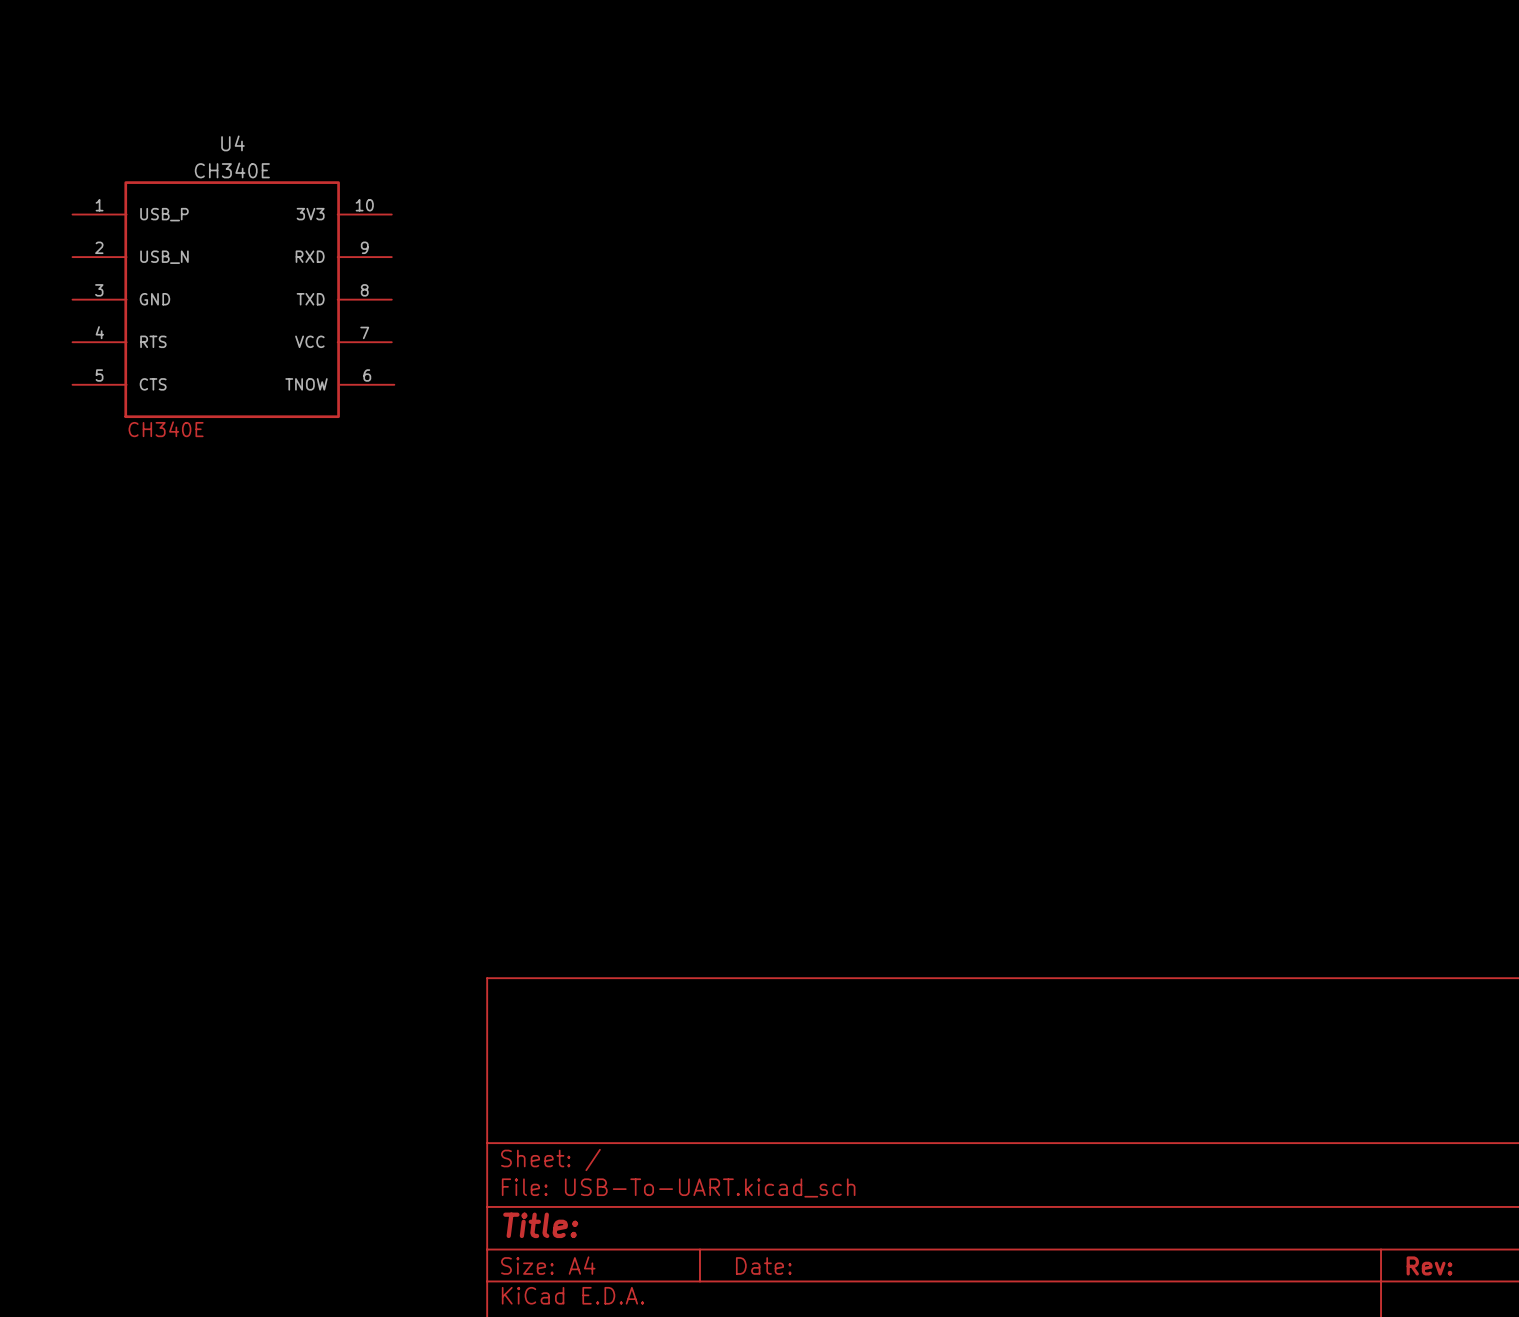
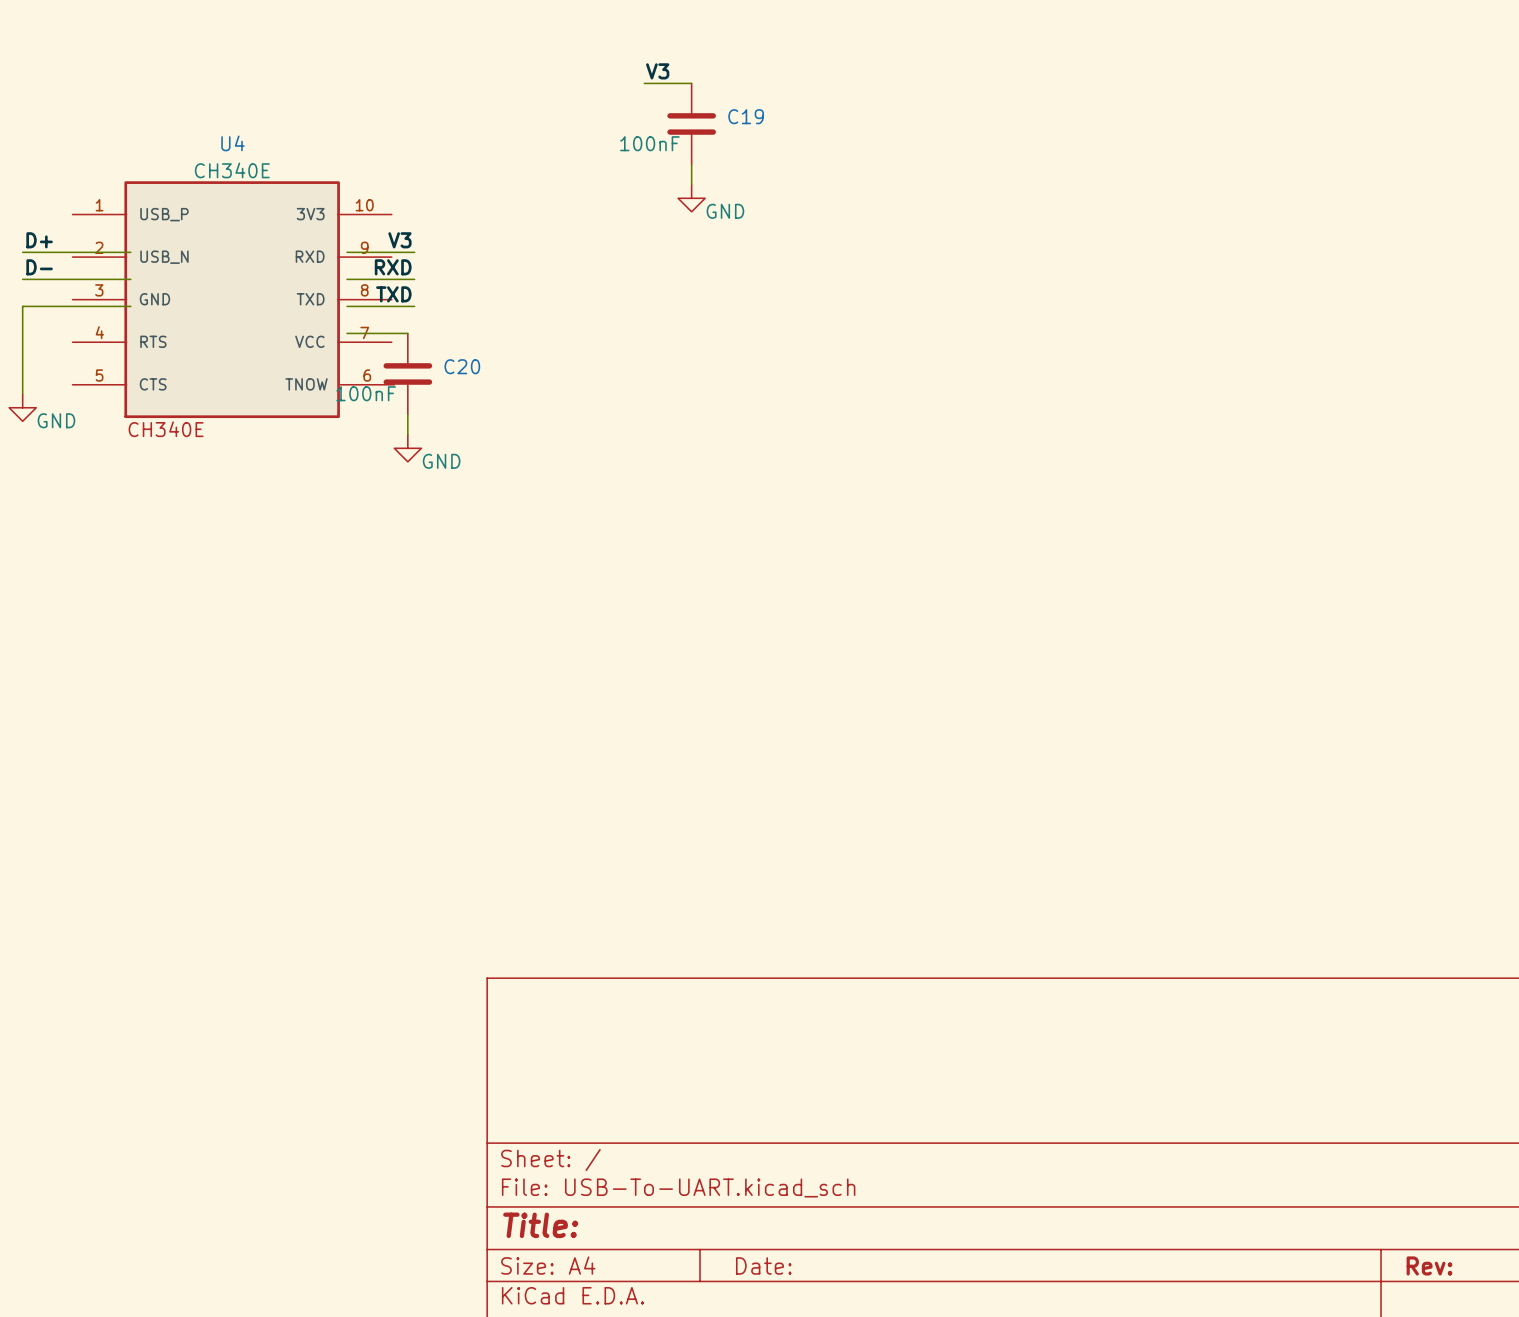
label: none -> V3 (657, 71)
wire: none -> (644, 83) (691, 83)
C19: none -> 100nF (691, 123)
wire: none -> (691, 164) (691, 184)
power symbol: none -> GND (691, 198)
label: none -> D+ (39, 240)
label: none -> V3 (399, 240)
wire: none -> (22, 252) (130, 252)
wire: none -> (347, 252) (414, 252)
label: none -> D- (39, 267)
label: none -> RXD (393, 267)
wire: none -> (22, 279) (130, 279)
wire: none -> (347, 279) (414, 279)
label: none -> TXD (393, 294)
wire: none -> (130, 306) (22, 306) (22, 394)
wire: none -> (347, 306) (414, 306)
wire: none -> (347, 333) (407, 333)
C20: none -> 100nF (407, 373)
power symbol: none -> GND (22, 407)
wire: none -> (407, 414) (407, 434)
power symbol: none -> GND (407, 448)

